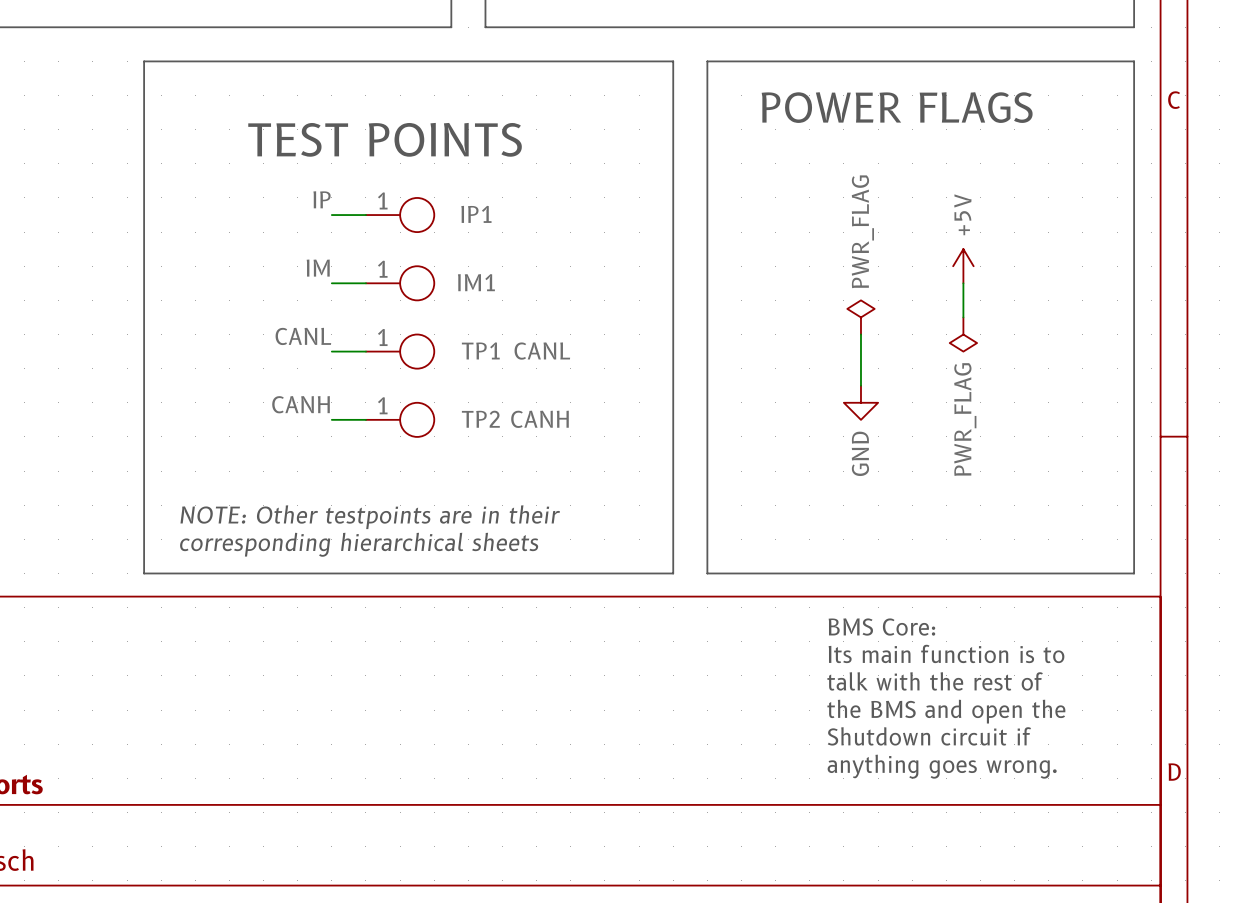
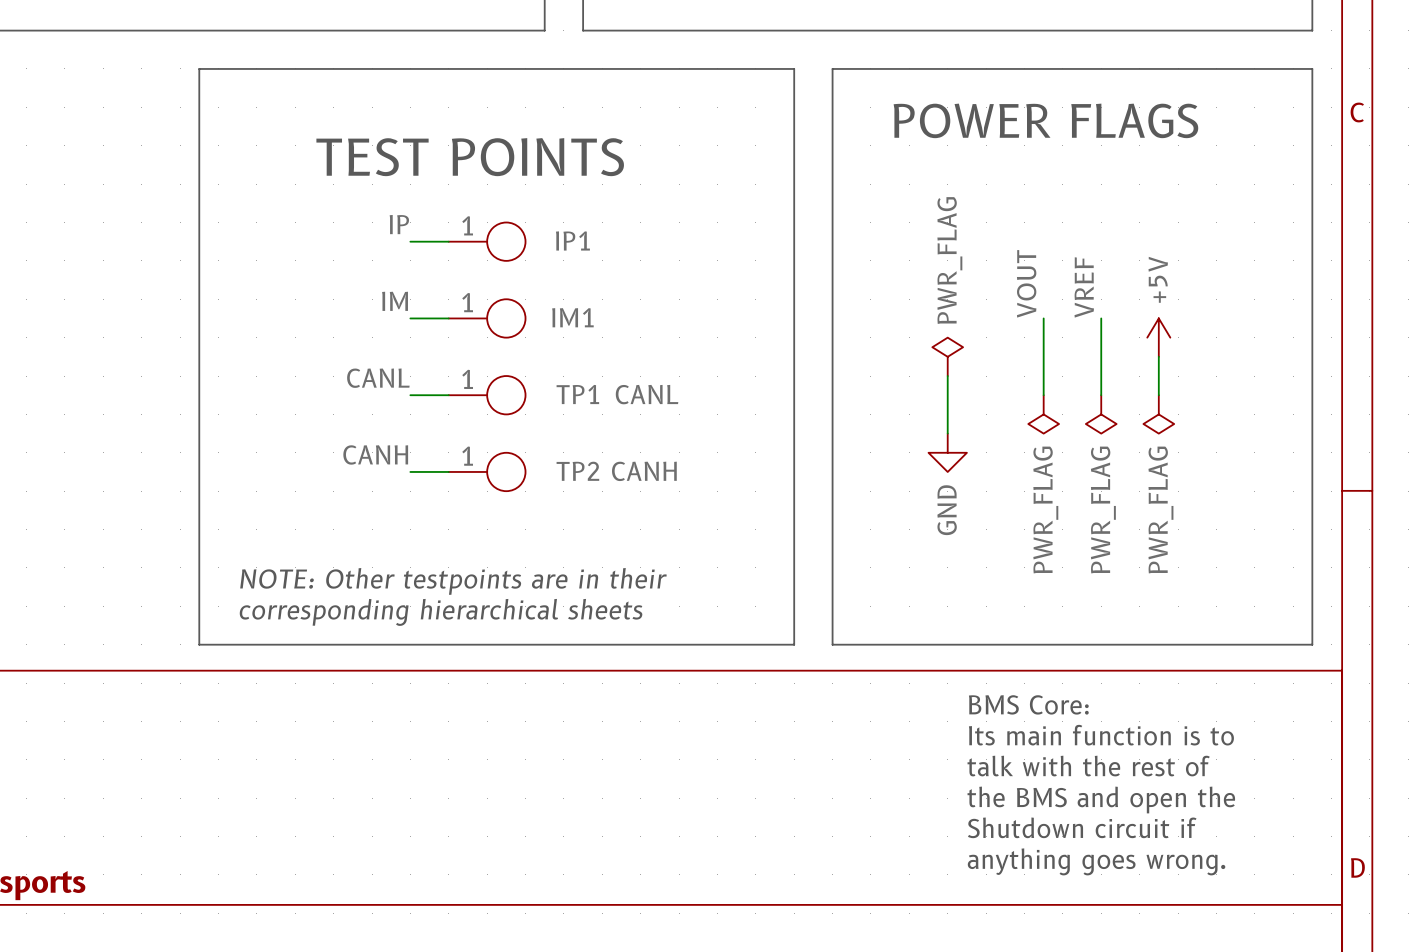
label: none -> VOUT (1026, 283)
label: none -> VREF (1084, 287)
power symbol position: +5V (963, 266) -> +5V (1158, 337)
wire: none -> (1043, 318) (1043, 395)
wire: none -> (1101, 318) (1101, 395)
wire: (963, 283) (963, 317) -> (1158, 356) (1158, 395)
power symbol: none -> PWR_FLAG (947, 356)
power symbol: PWR_FLAG (860, 317) -> none
wire: (860, 334) (860, 385) -> (947, 376) (947, 433)
power symbol: PWR_FLAG (963, 334) -> none
power symbol: none -> PWR_FLAG (1043, 414)
power symbol: none -> PWR_FLAG (1101, 414)
power symbol: none -> PWR_FLAG (1158, 414)
power symbol position: GND (860, 402) -> GND (947, 452)

